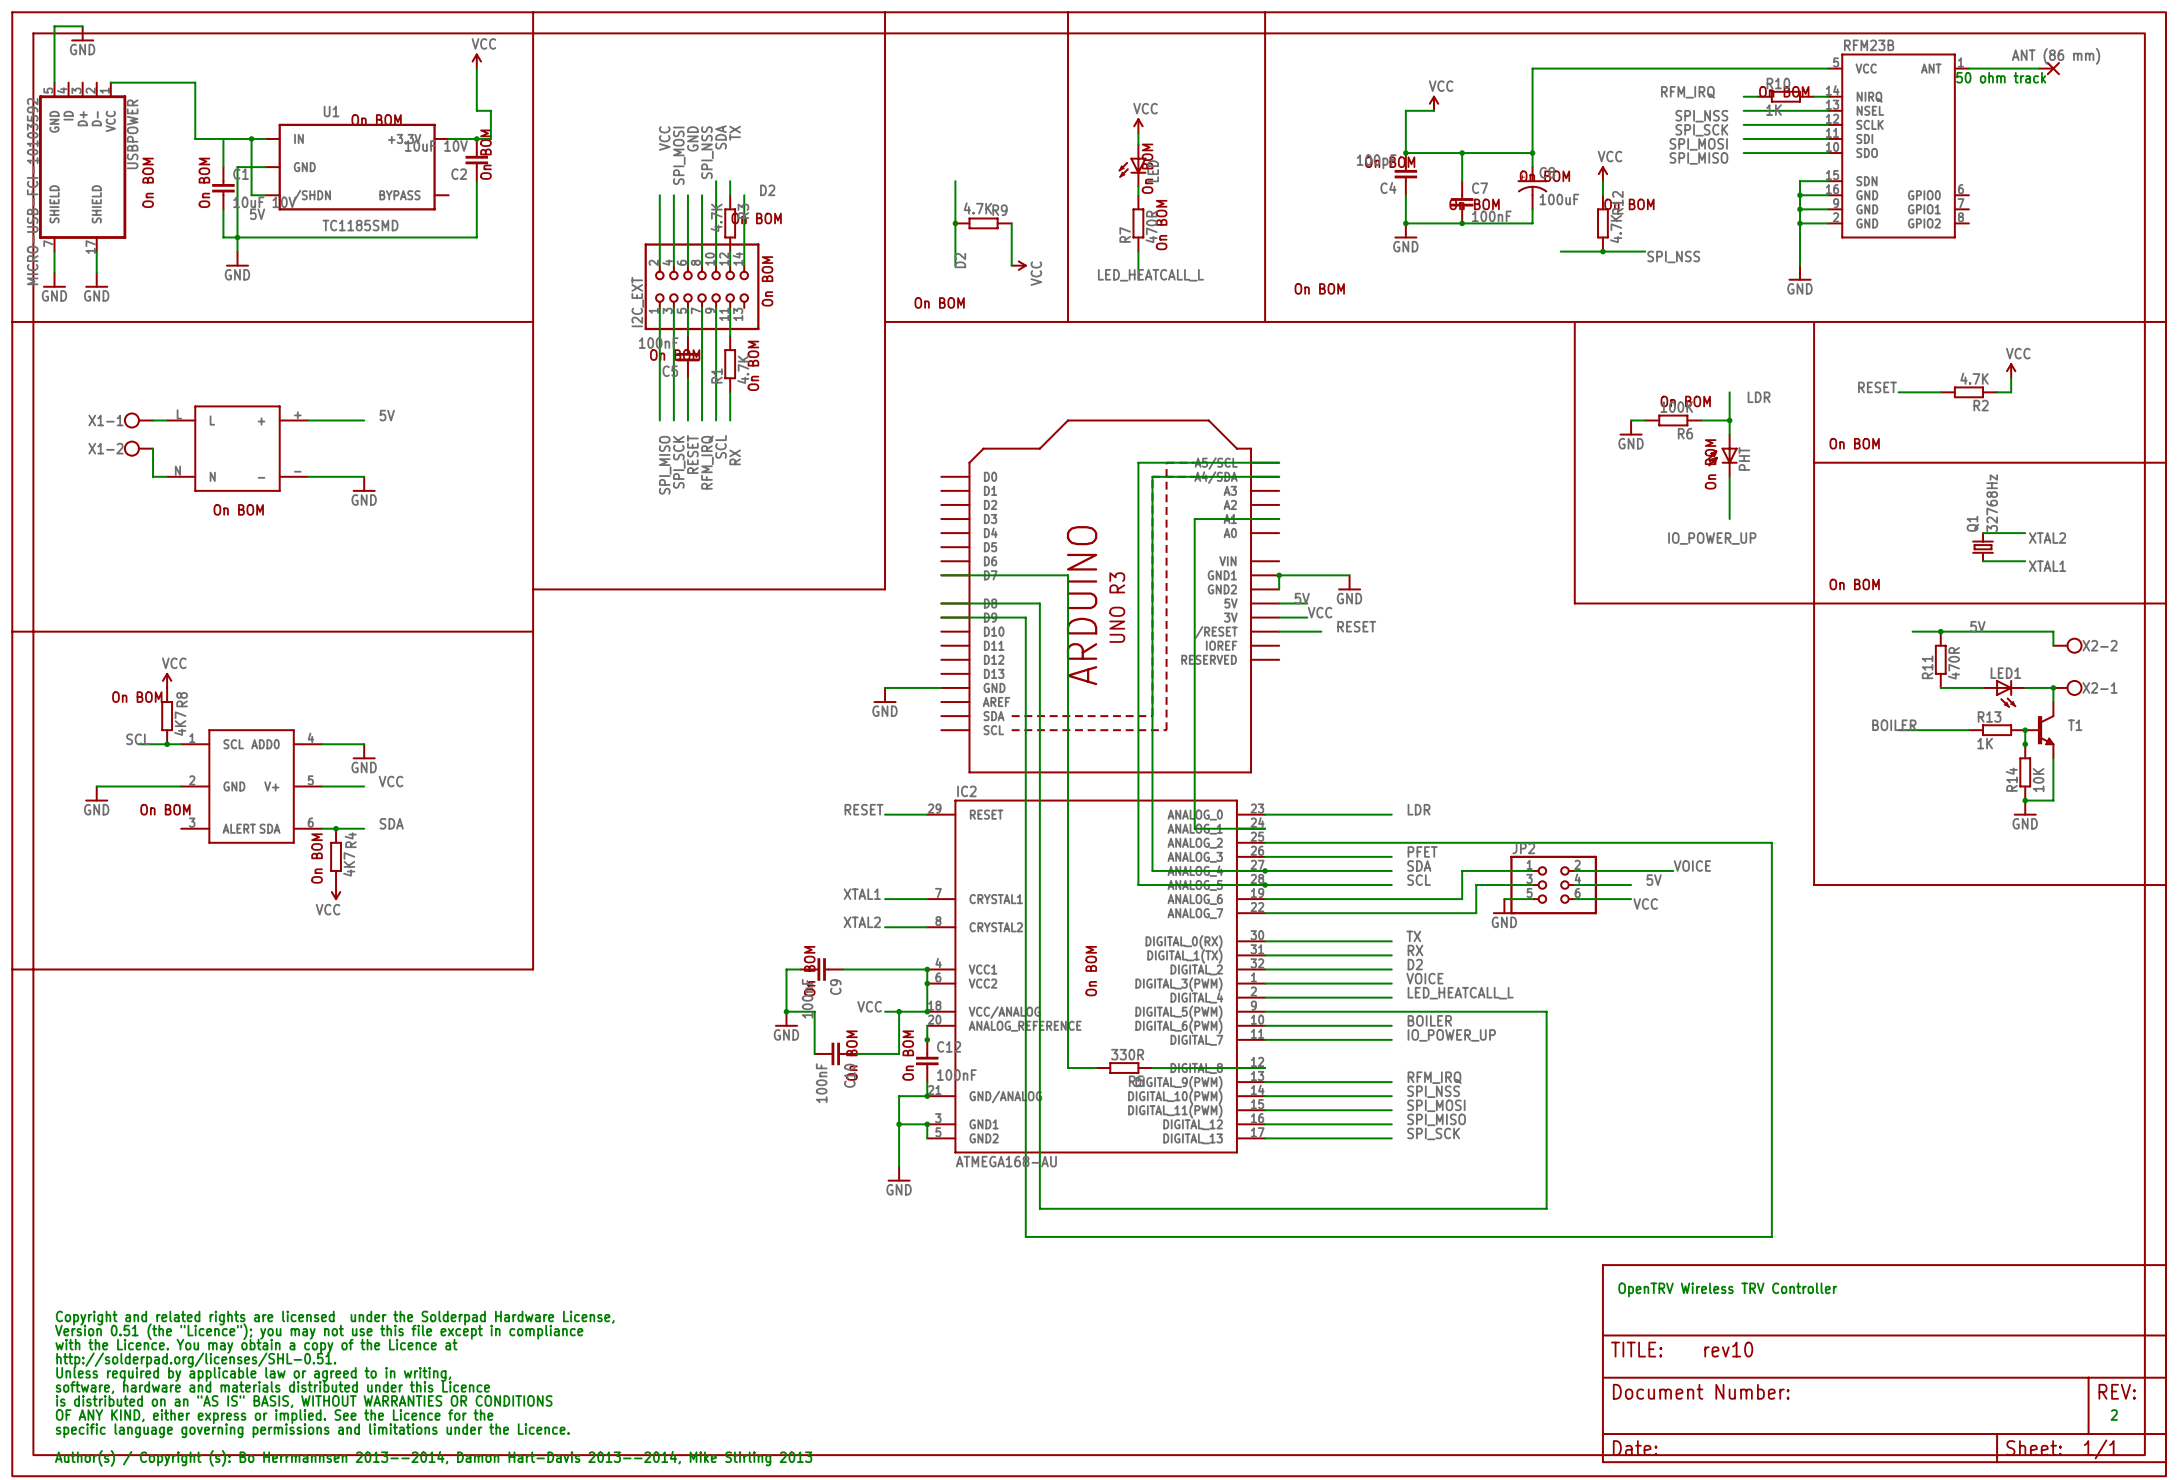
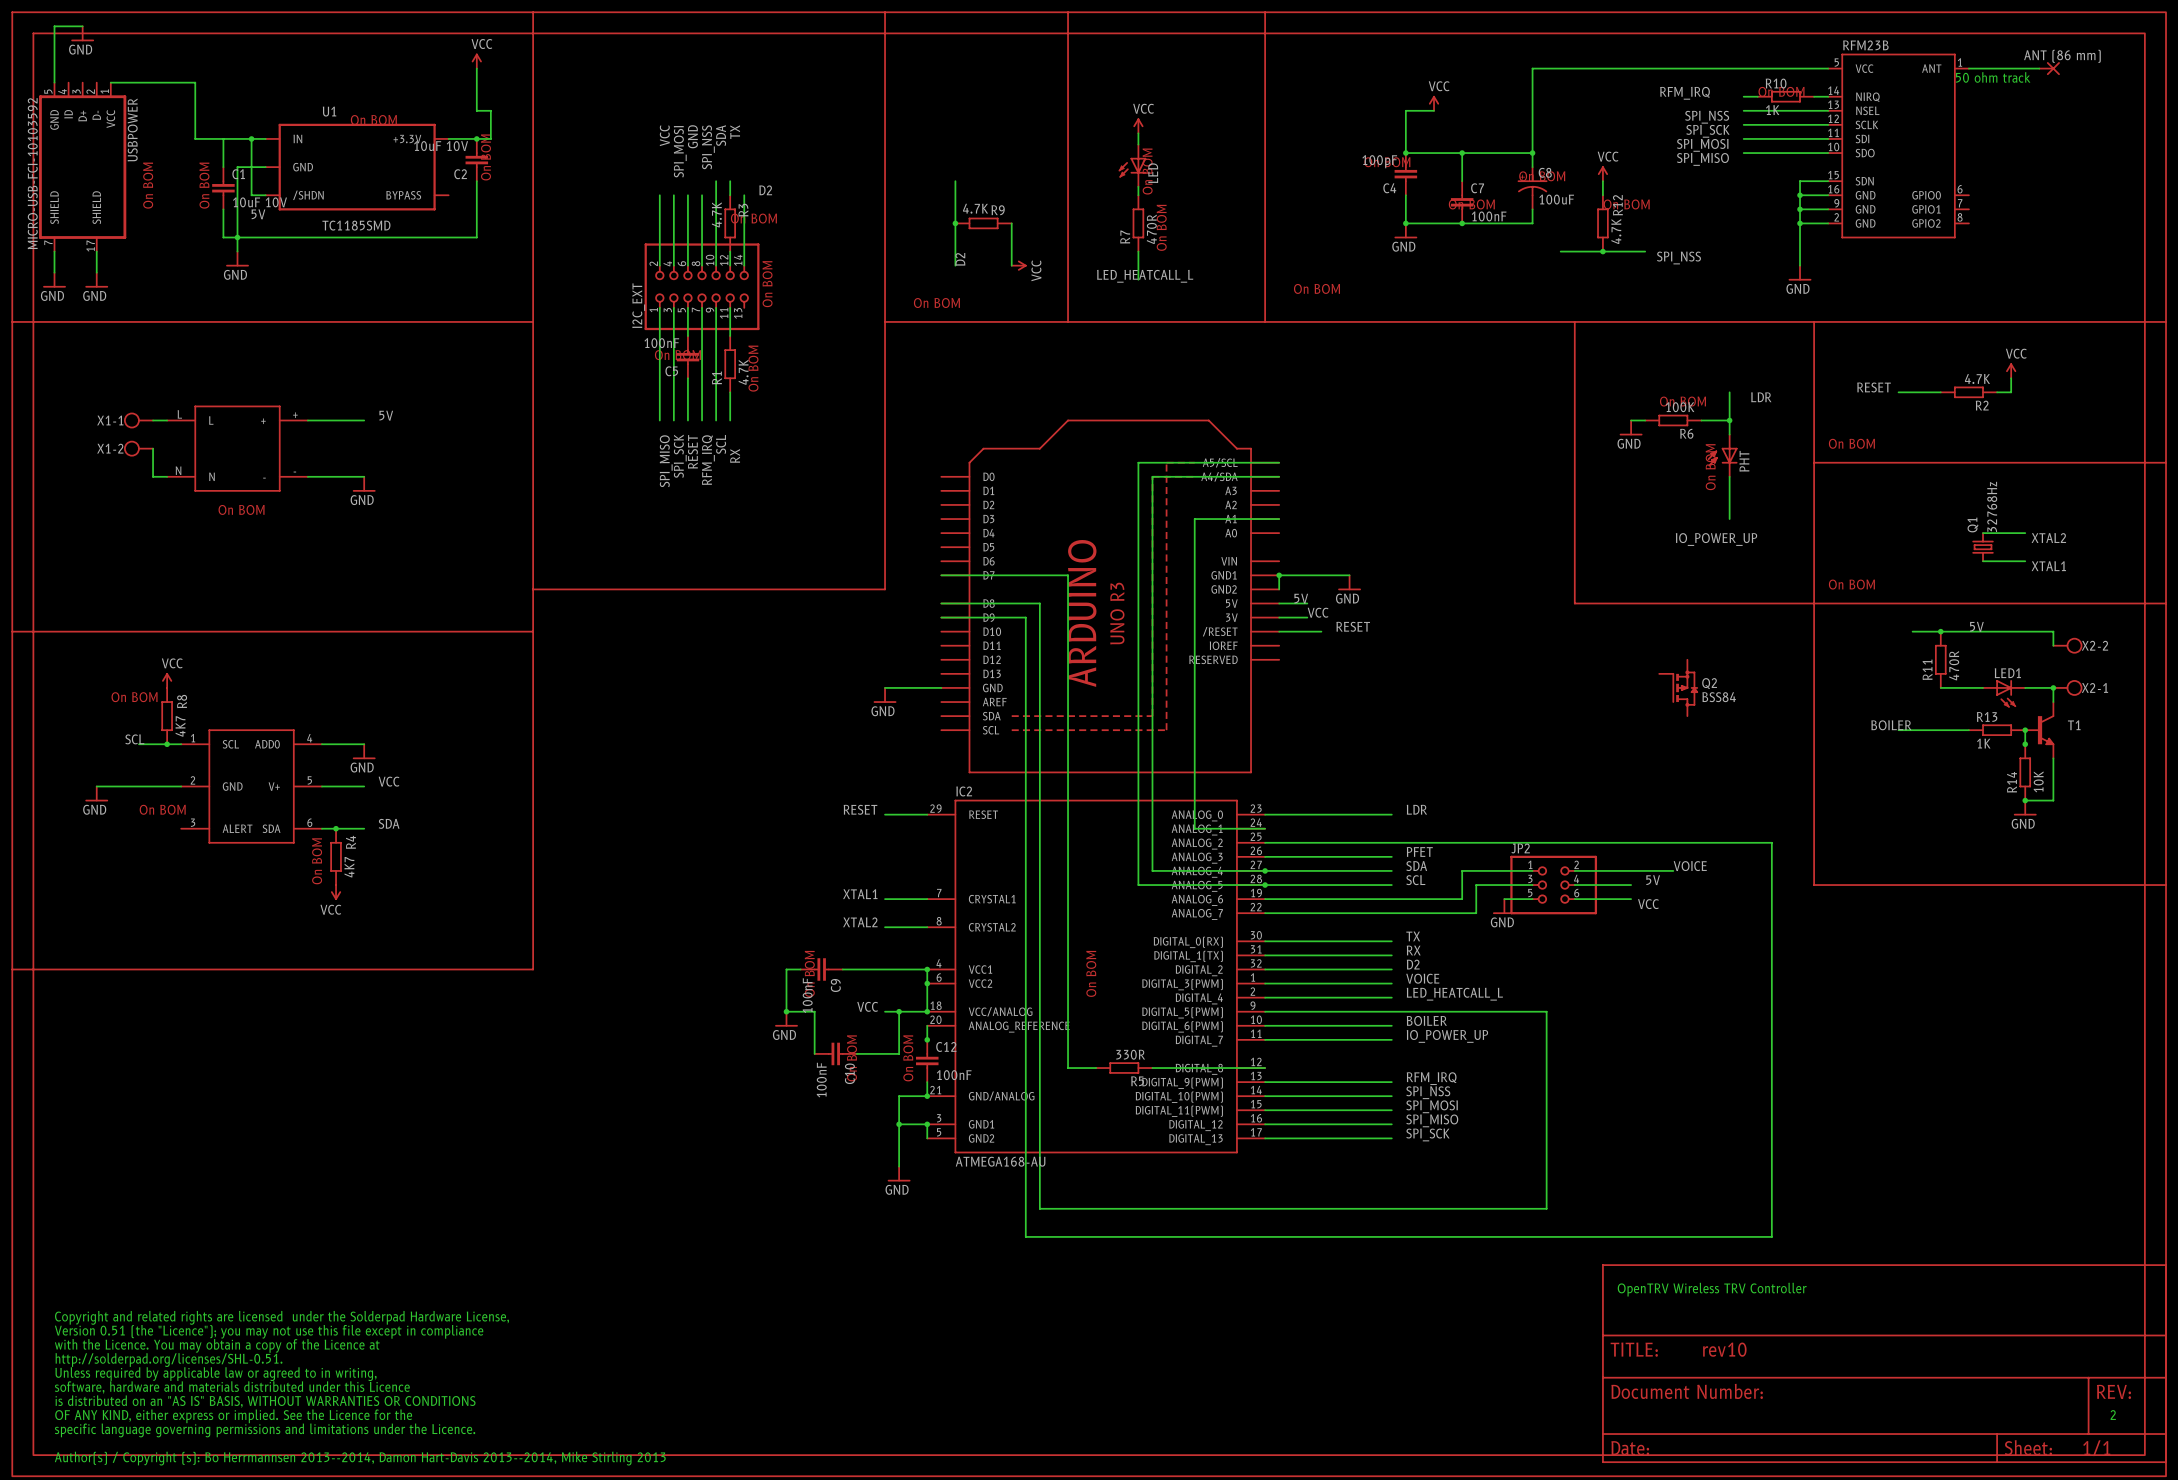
Q2: none -> BSS84 (1678, 687)

